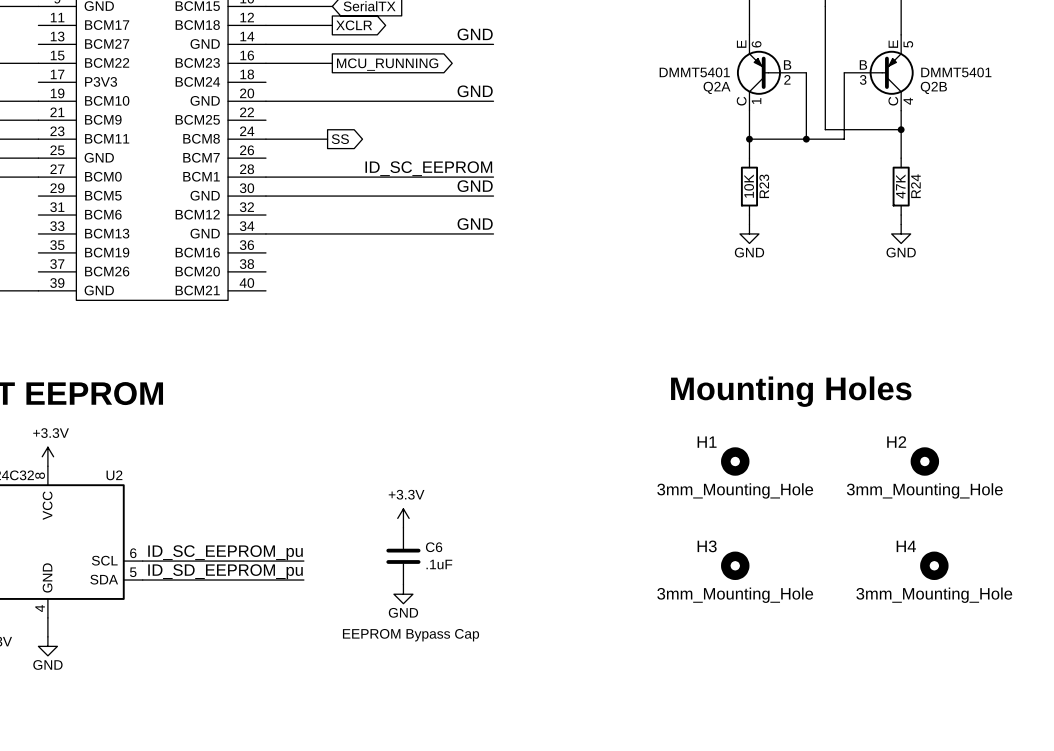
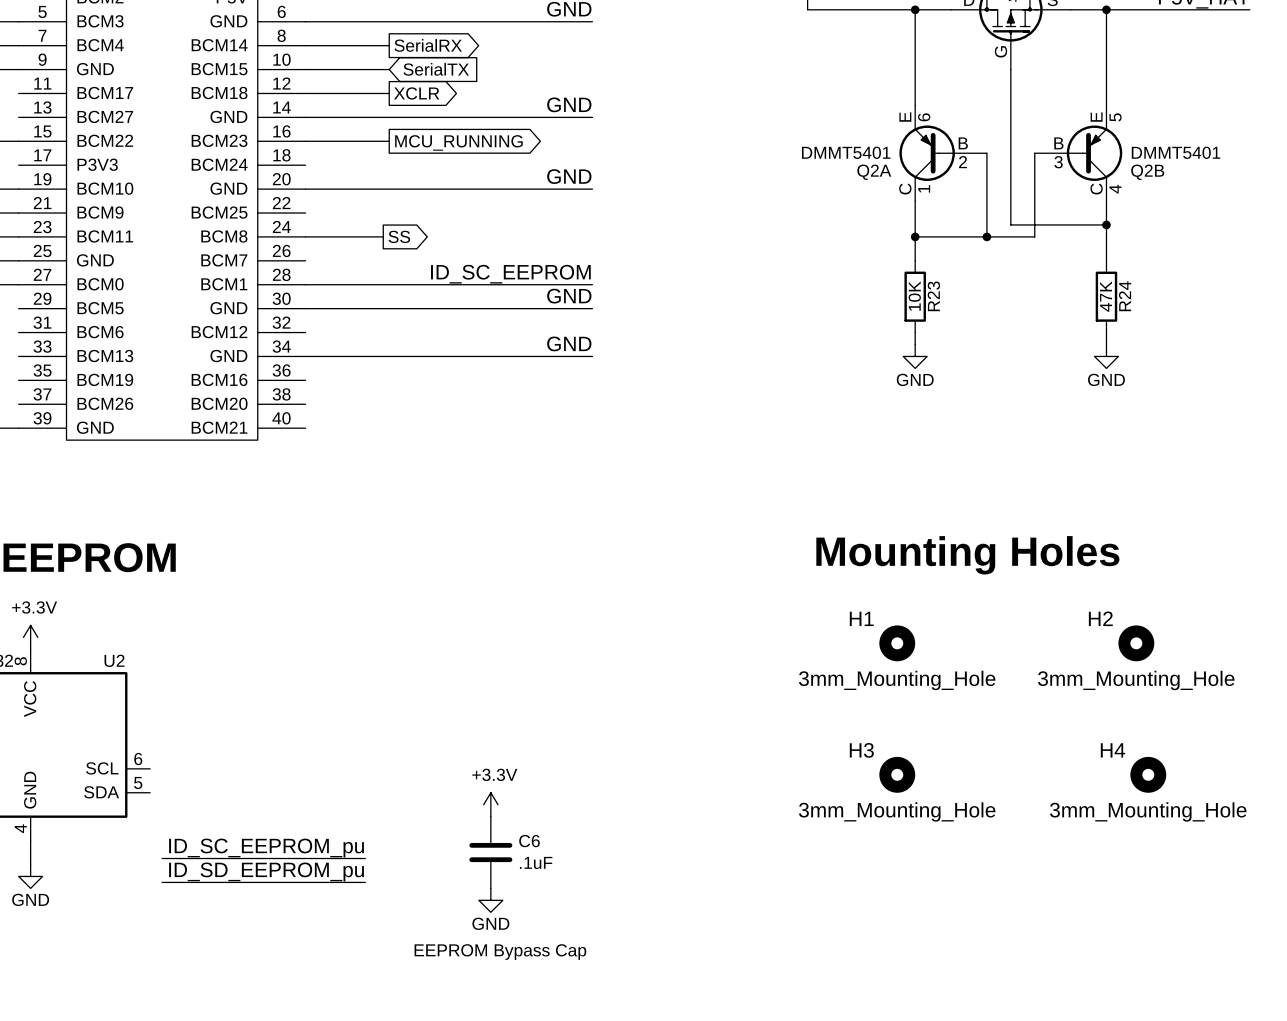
power symbol position: +3.3V (403, 518) -> +3.3V (490, 804)
label position: ID_SC_EEPROM_pu (225, 552) -> ID_SC_EEPROM_pu (266, 848)
C6 position: (403, 556) -> (490, 852)
wire: (142, 561) (303, 561) -> (162, 858) (365, 858)
label position: ID_SD_EEPROM_pu (225, 571) -> ID_SD_EEPROM_pu (266, 871)
wire: (142, 580) (303, 580) -> (162, 882) (365, 882)
power symbol position: GND (403, 594) -> GND (490, 900)
text position: EEPROM Bypass Cap (411, 635) -> EEPROM Bypass Cap (500, 952)

